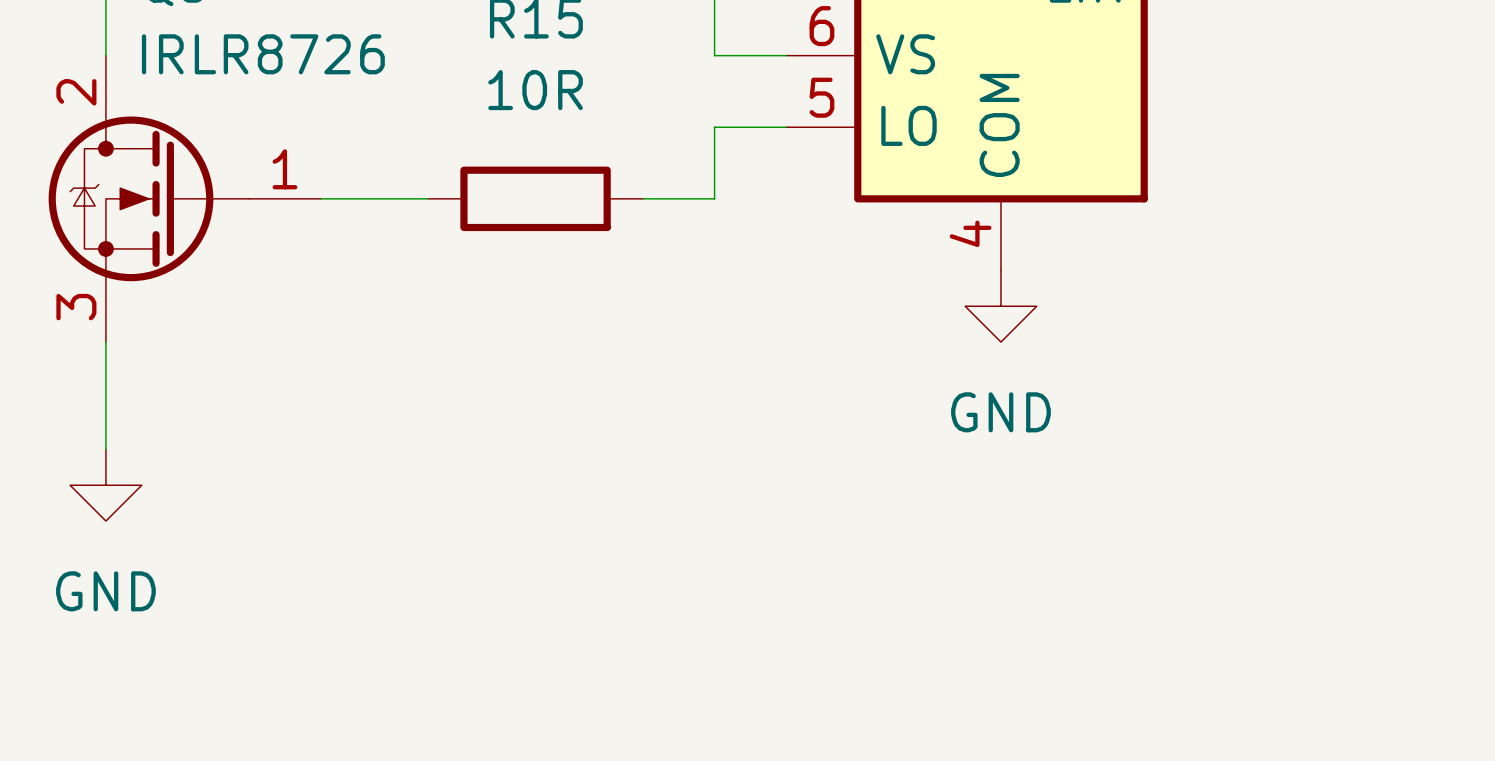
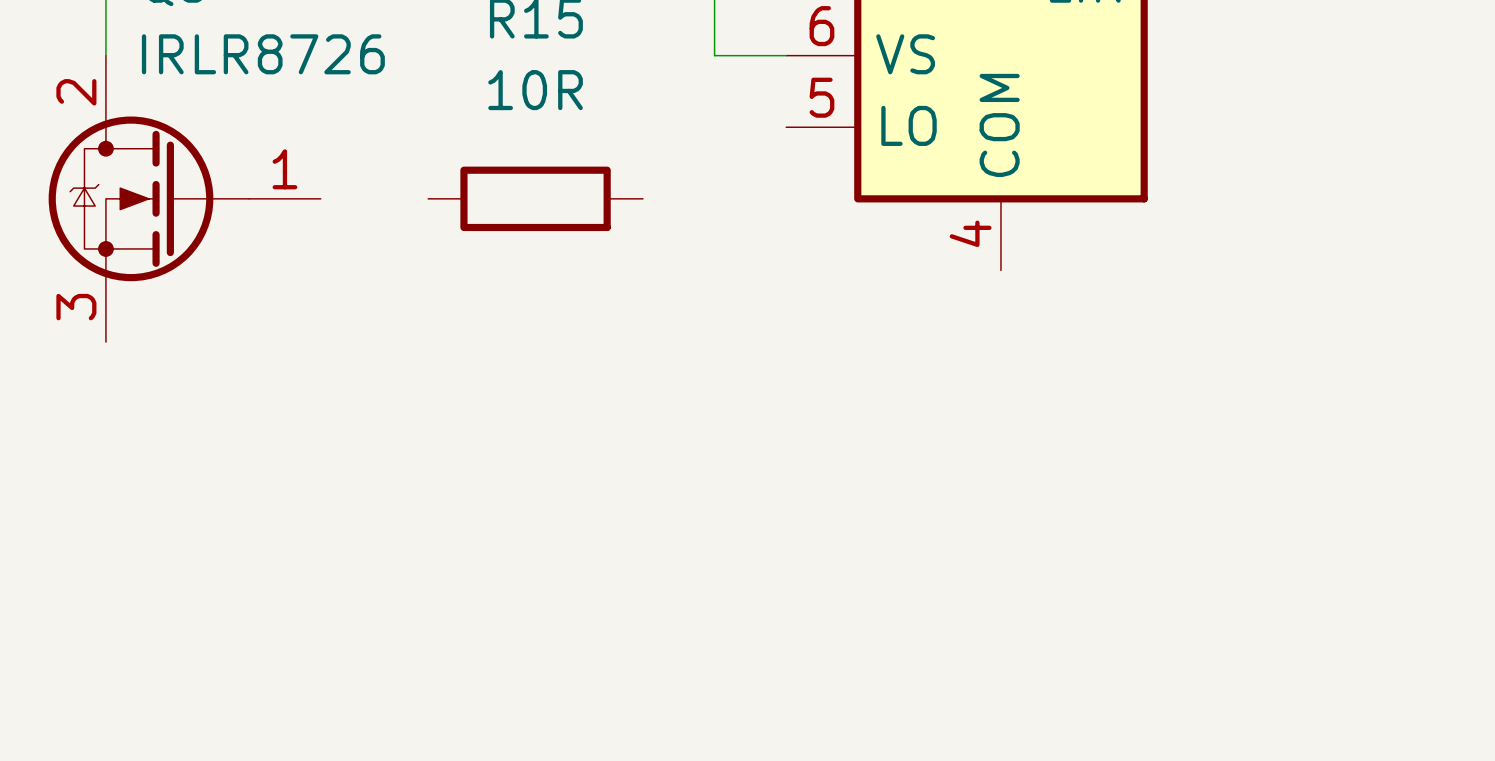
wire: (786, 127) (714, 127) (714, 198) (642, 198) -> none
wire: (320, 198) (428, 198) -> none
power symbol: GND (1000, 306) -> none
wire: (105, 342) (105, 449) -> none
power symbol: GND (105, 485) -> none

